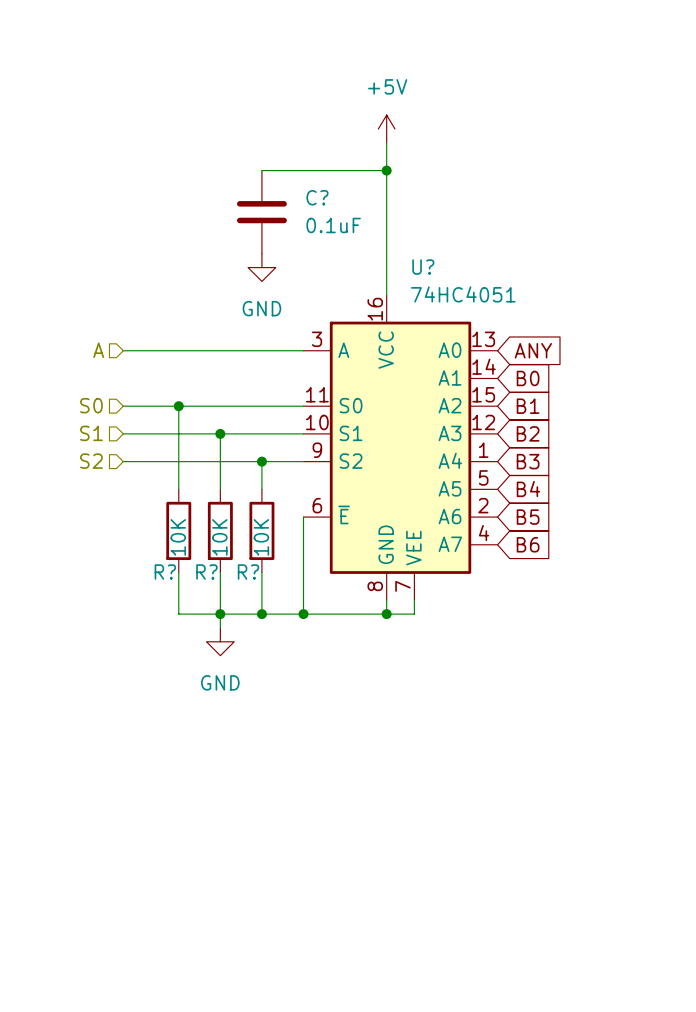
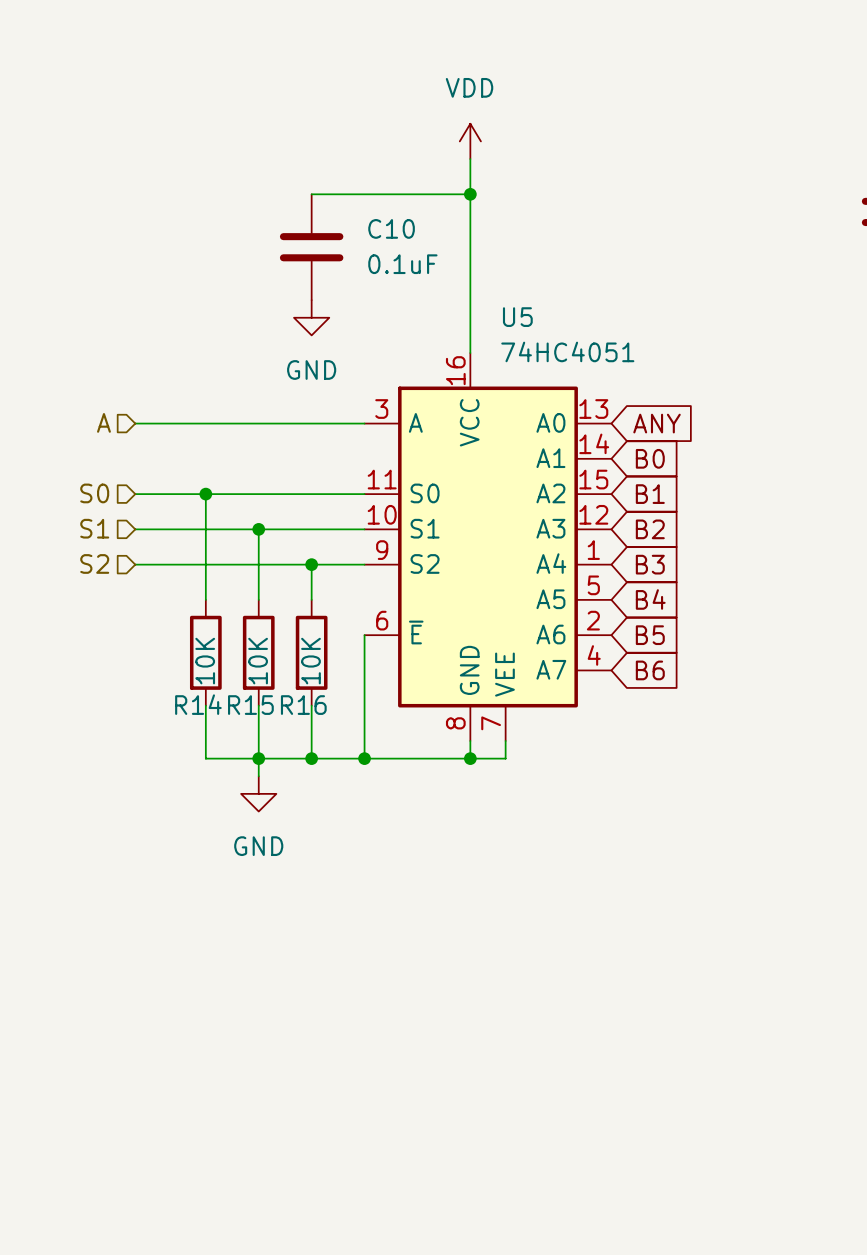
power symbol: +5V (386, 128) -> VDD (470, 141)
C? name: C? (317, 197) -> C10 (391, 228)
U? name: U? (423, 267) -> U5 (517, 317)
R? name: R? (165, 571) -> R14 (198, 704)
R? name: R? (206, 571) -> R15 (250, 705)
R? name: R? (248, 571) -> R16 (303, 705)

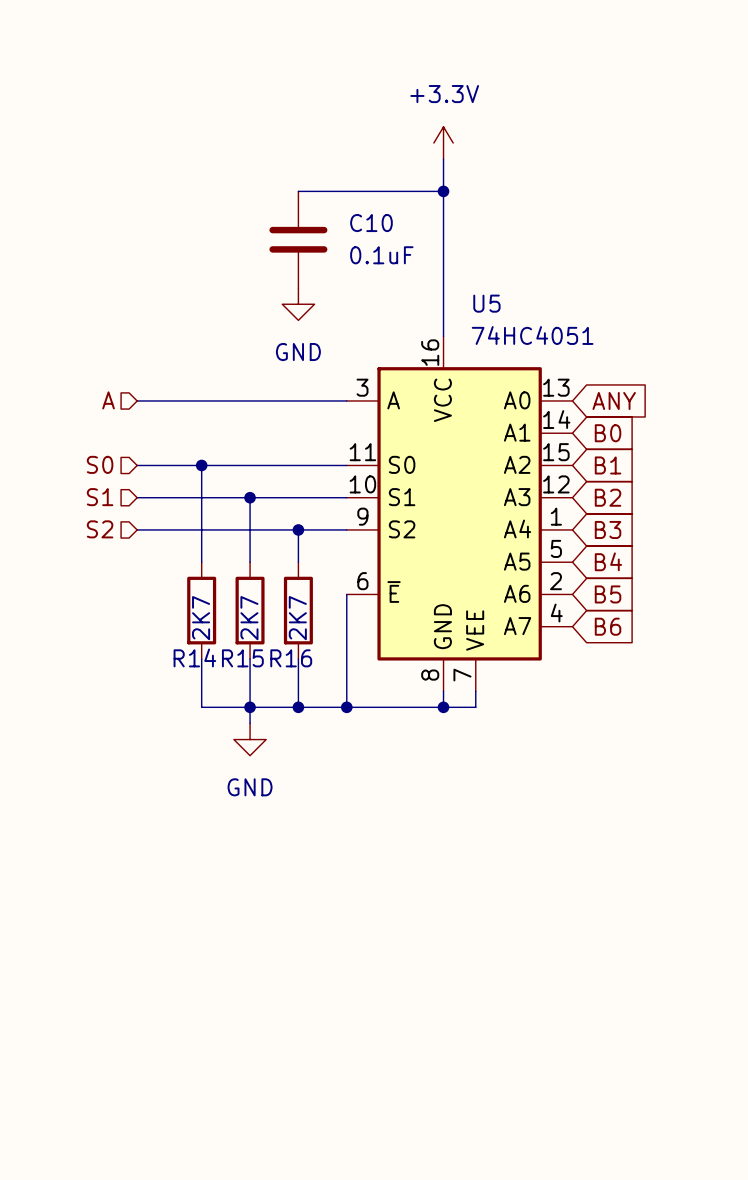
power symbol: VDD (470, 141) -> +3.3V (443, 143)
R14 value: 10K (205, 661) -> 2K7 (201, 618)
R15 value: 10K (258, 661) -> 2K7 (249, 618)
R16 value: 10K (310, 661) -> 2K7 (297, 618)

